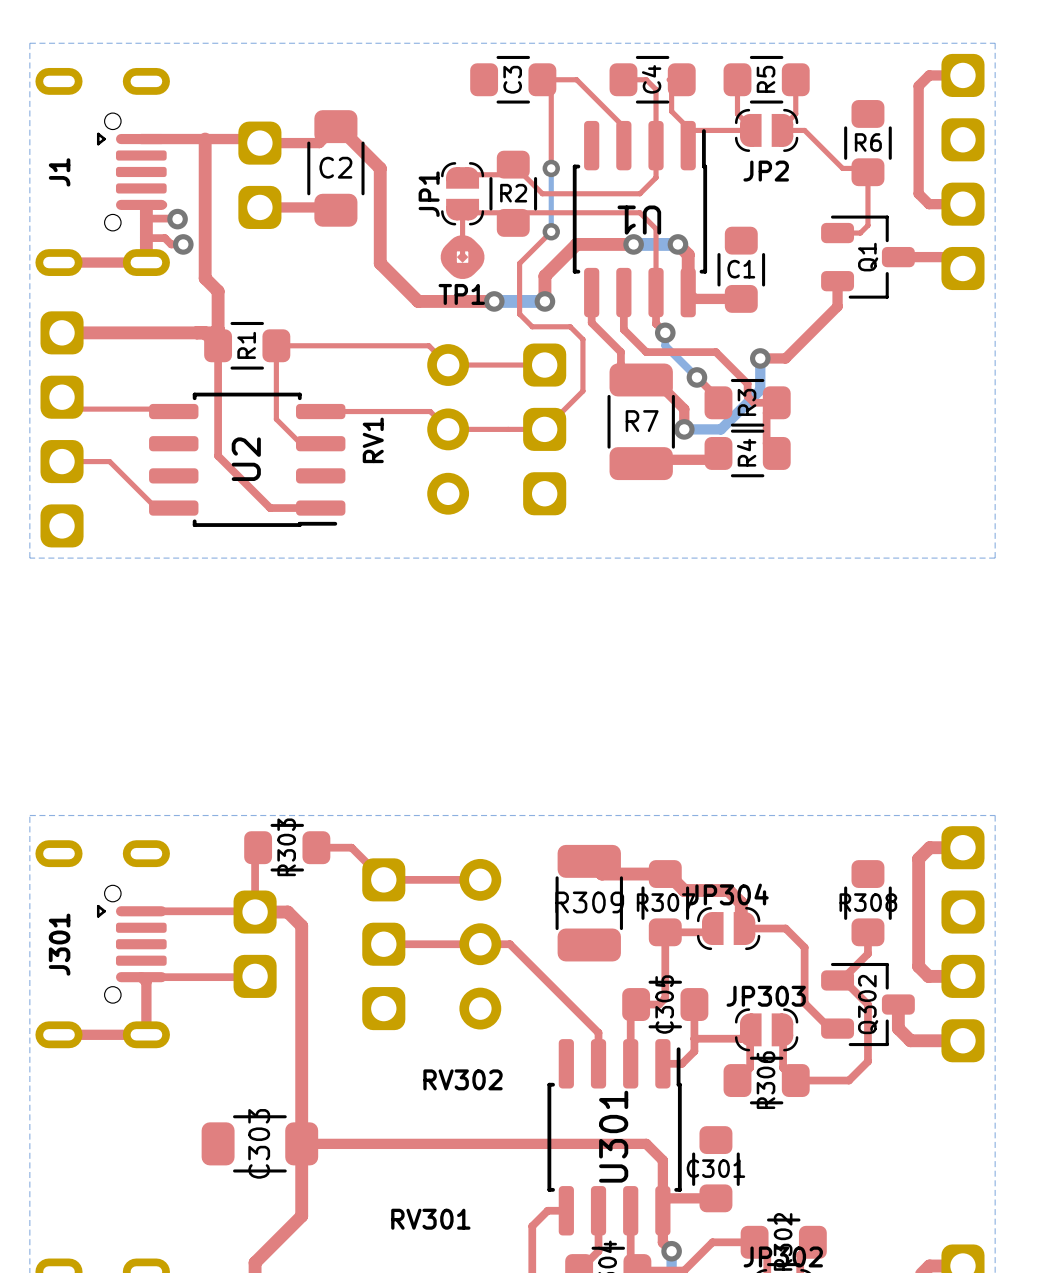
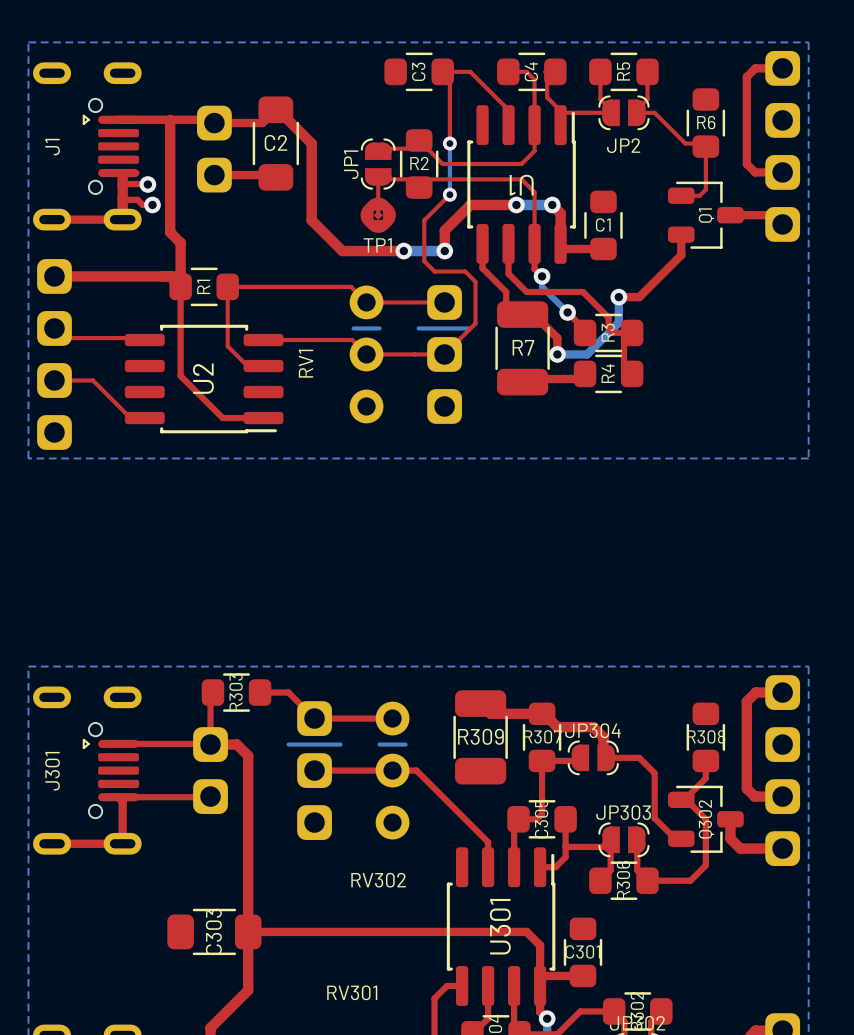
bottom track: none -> (353, 328) (379, 328)
bottom track: none -> (418, 328) (470, 328)
bottom track: none -> (288, 744) (340, 744)
bottom track: none -> (379, 744) (405, 744)

